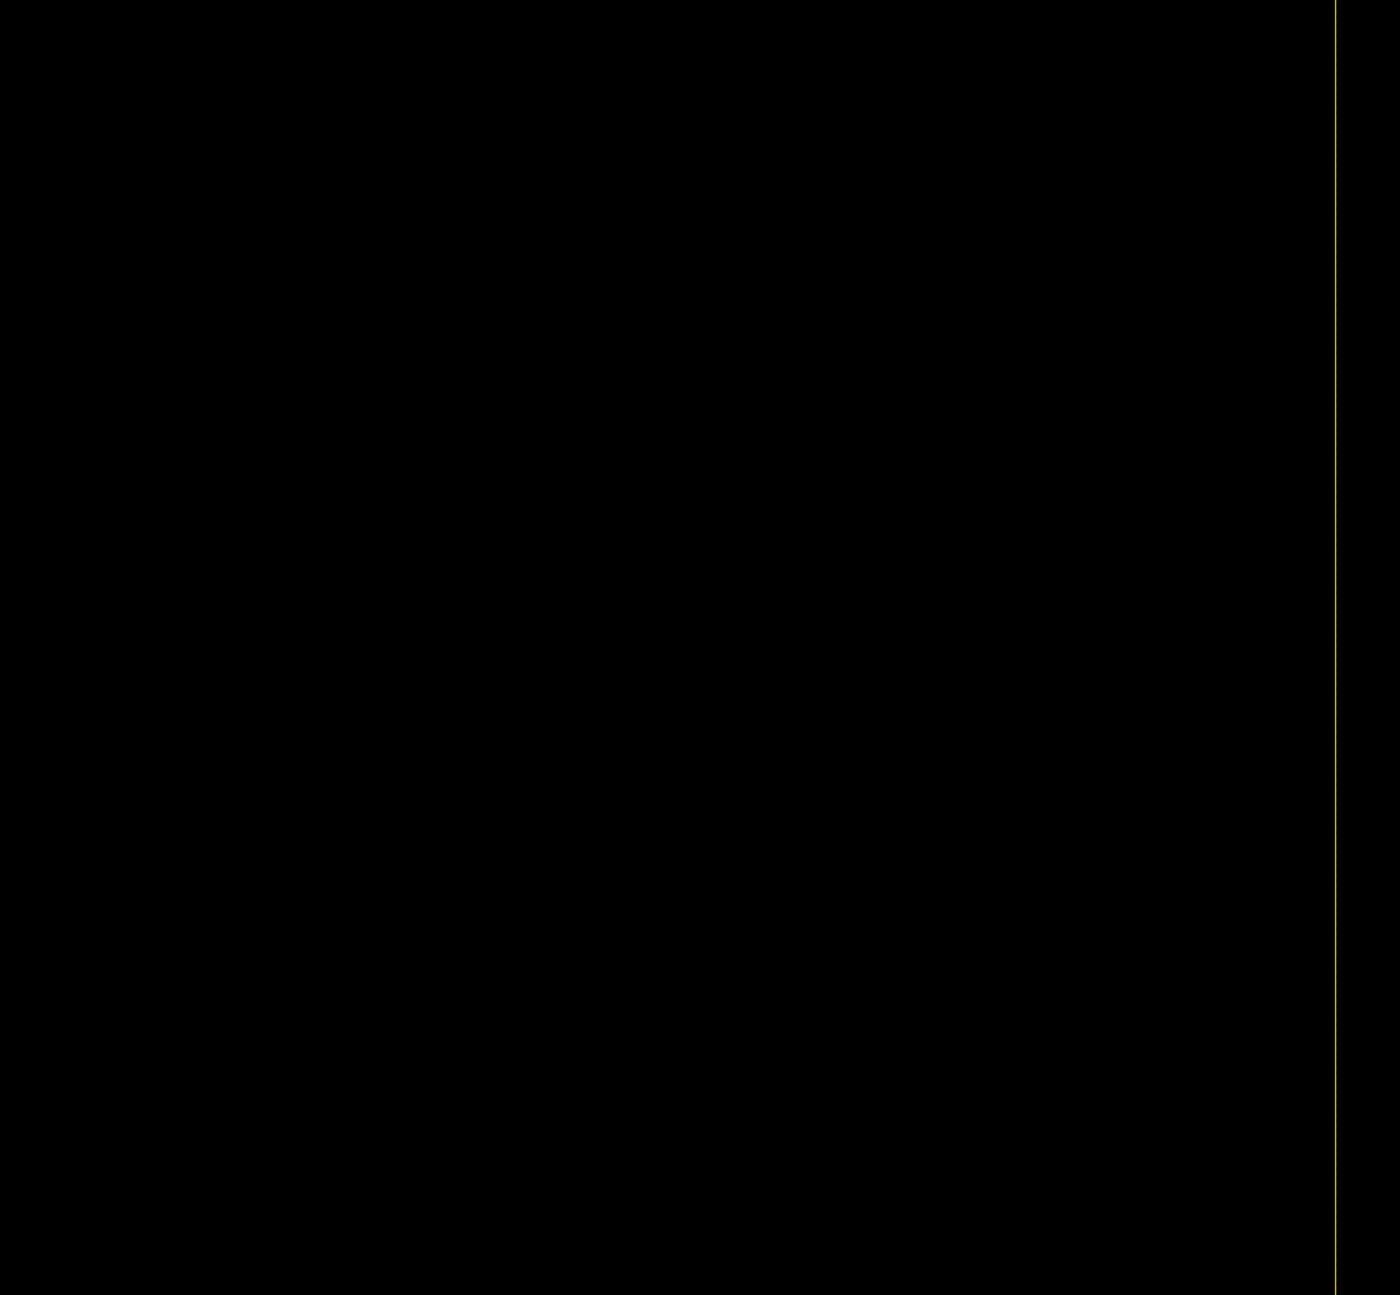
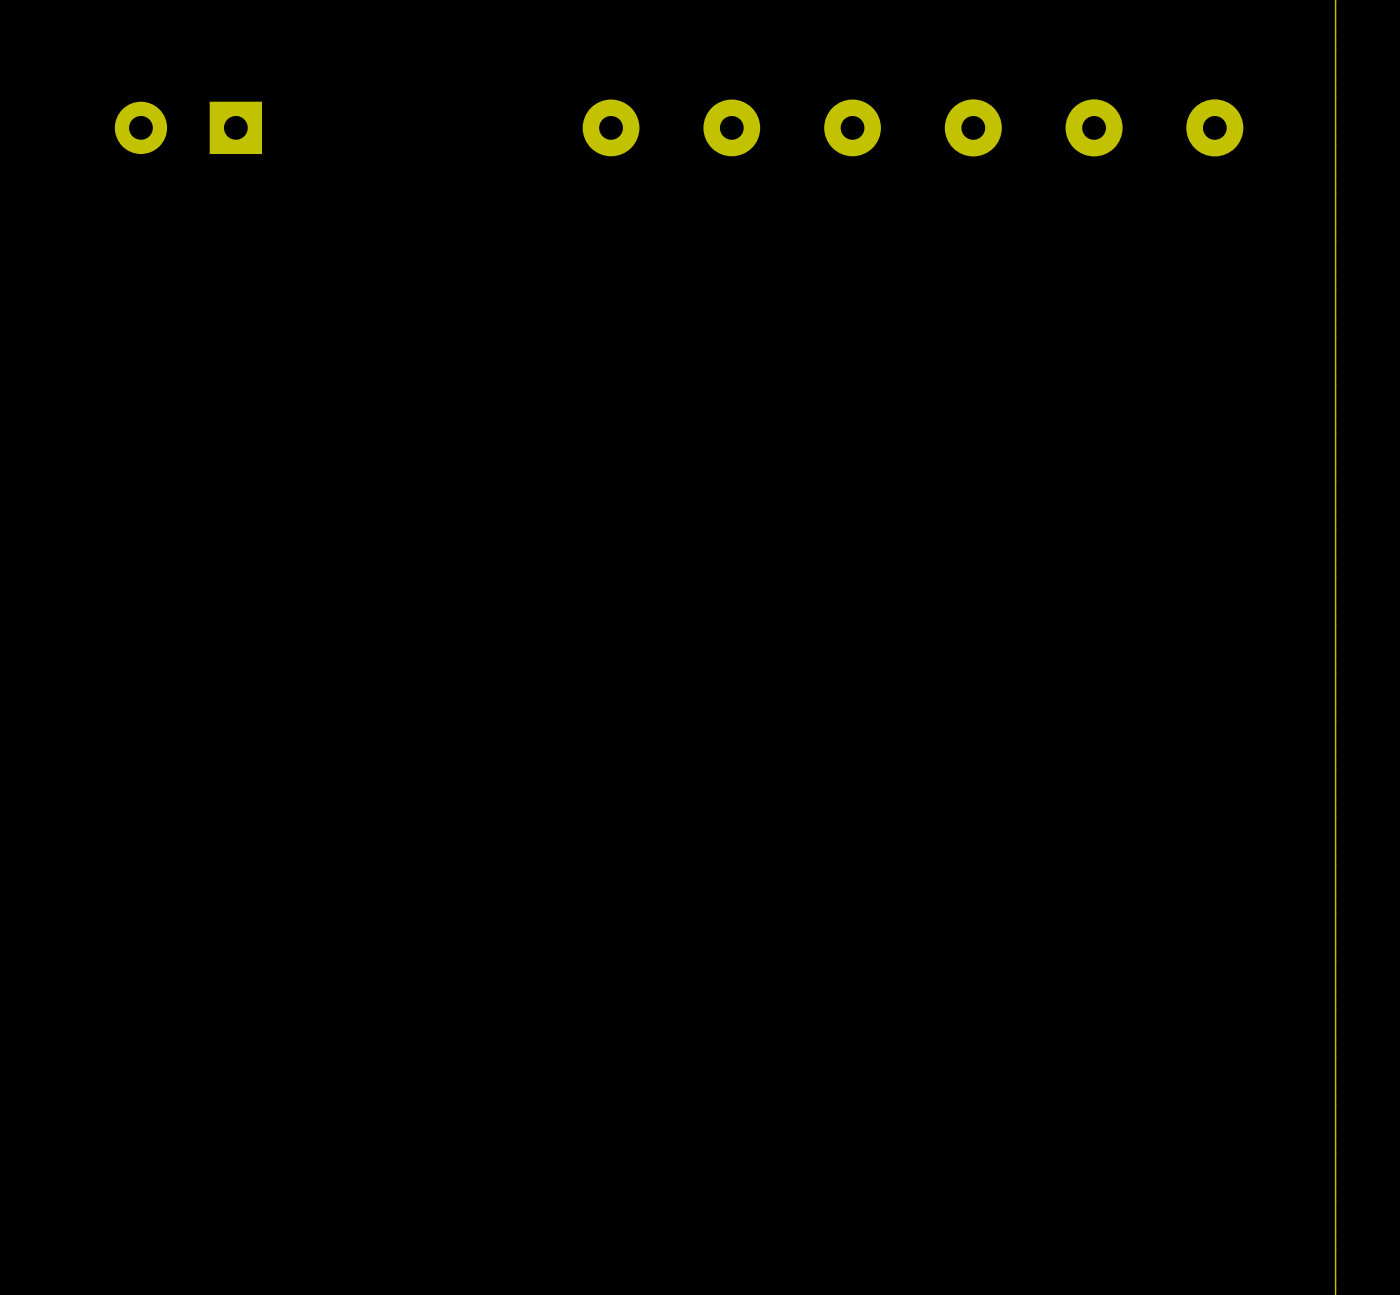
part: none -> (188, 127)
part: none -> (731, 127)
part: none -> (1094, 127)

